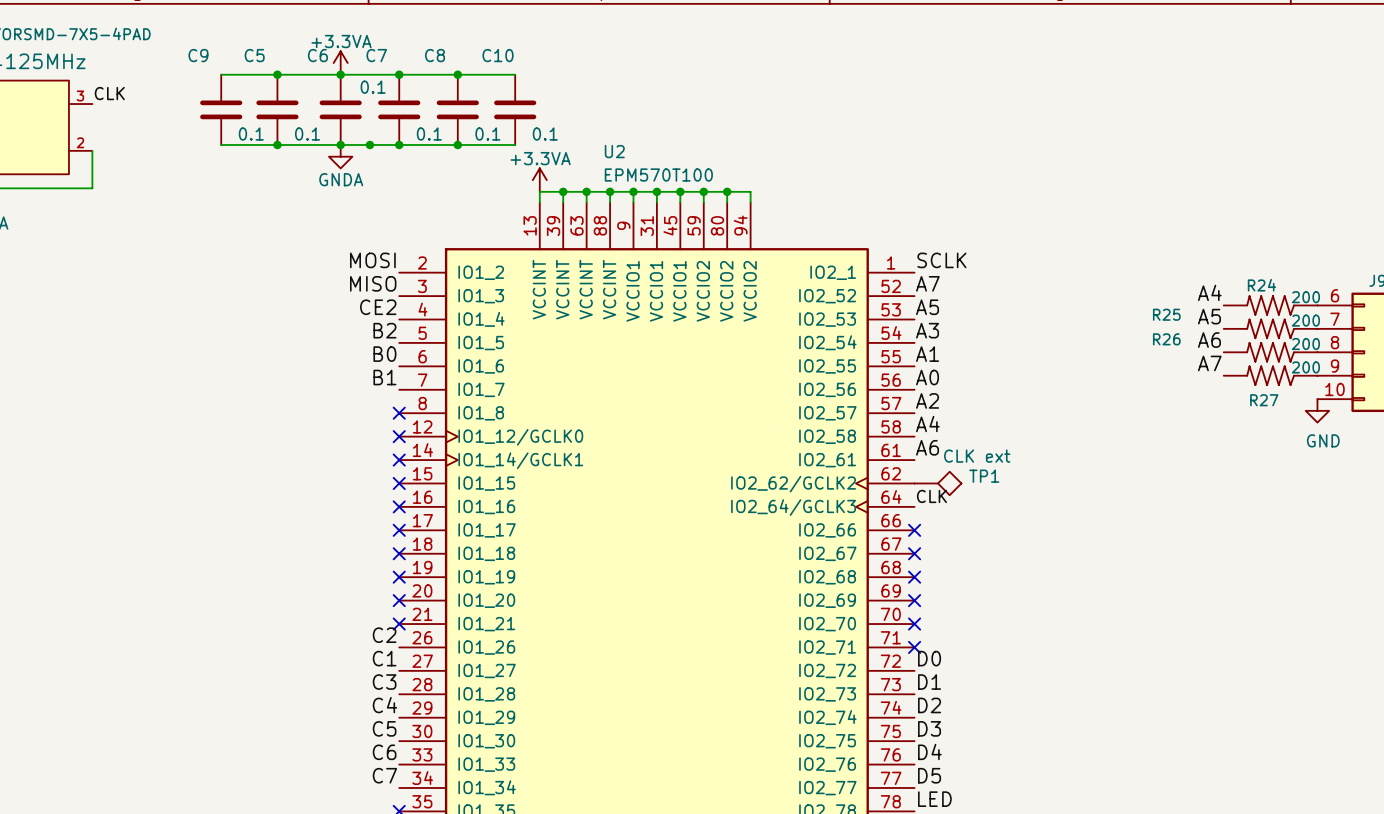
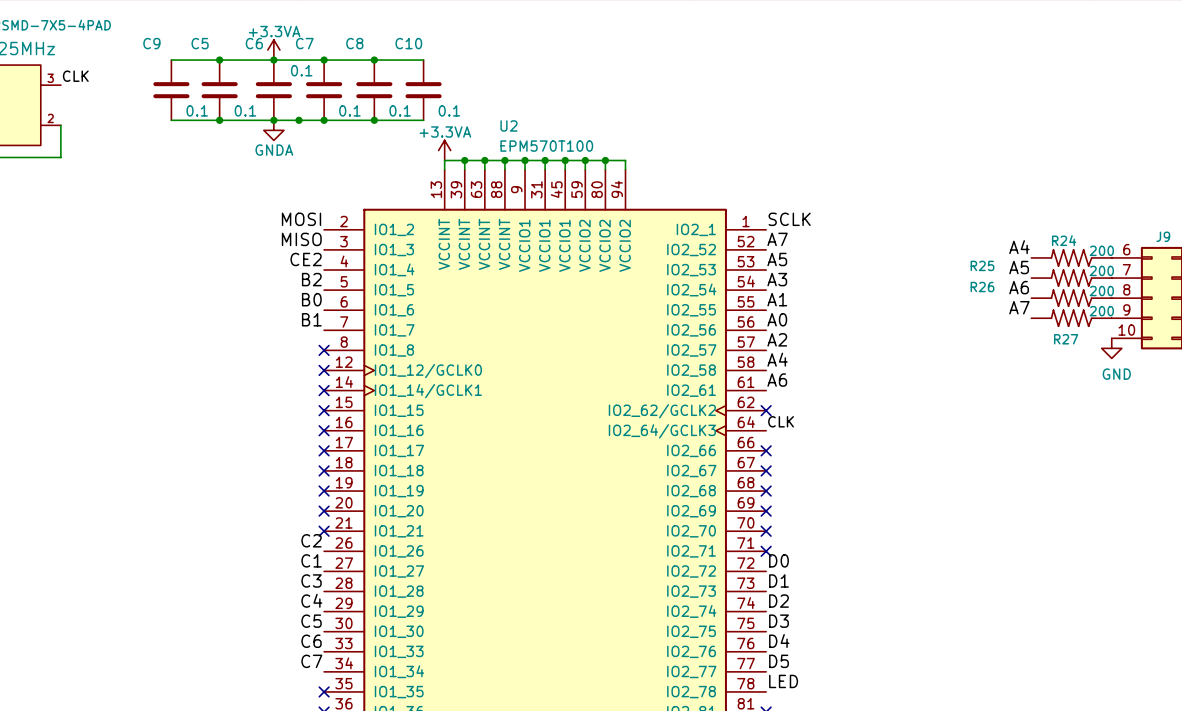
no-connect mark: none -> (766, 410)
TP1: CLK ext (937, 483) -> none

